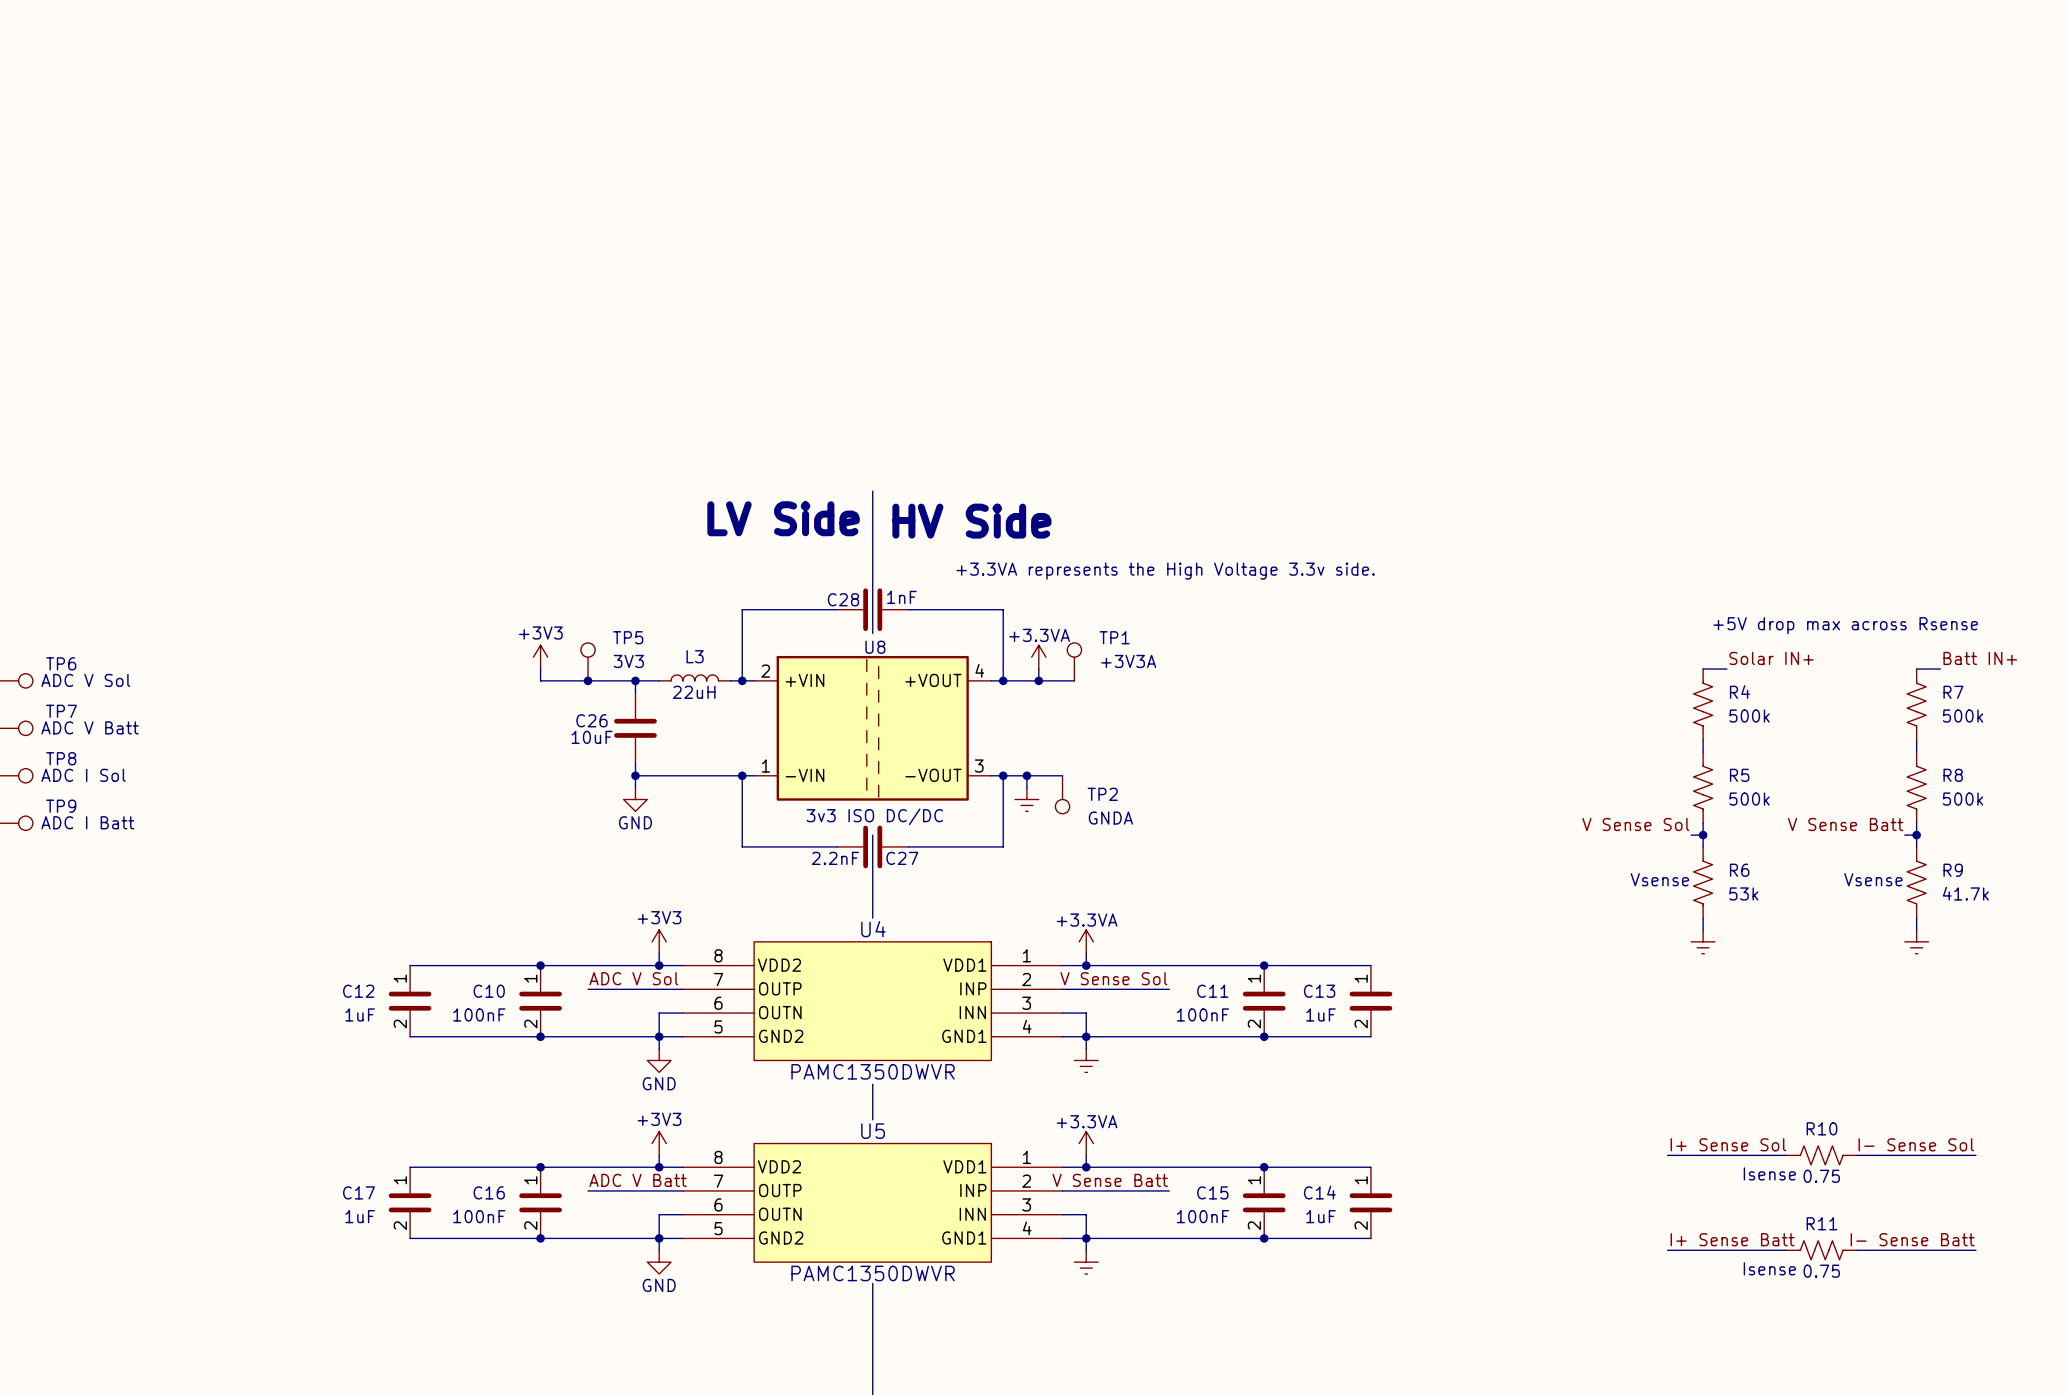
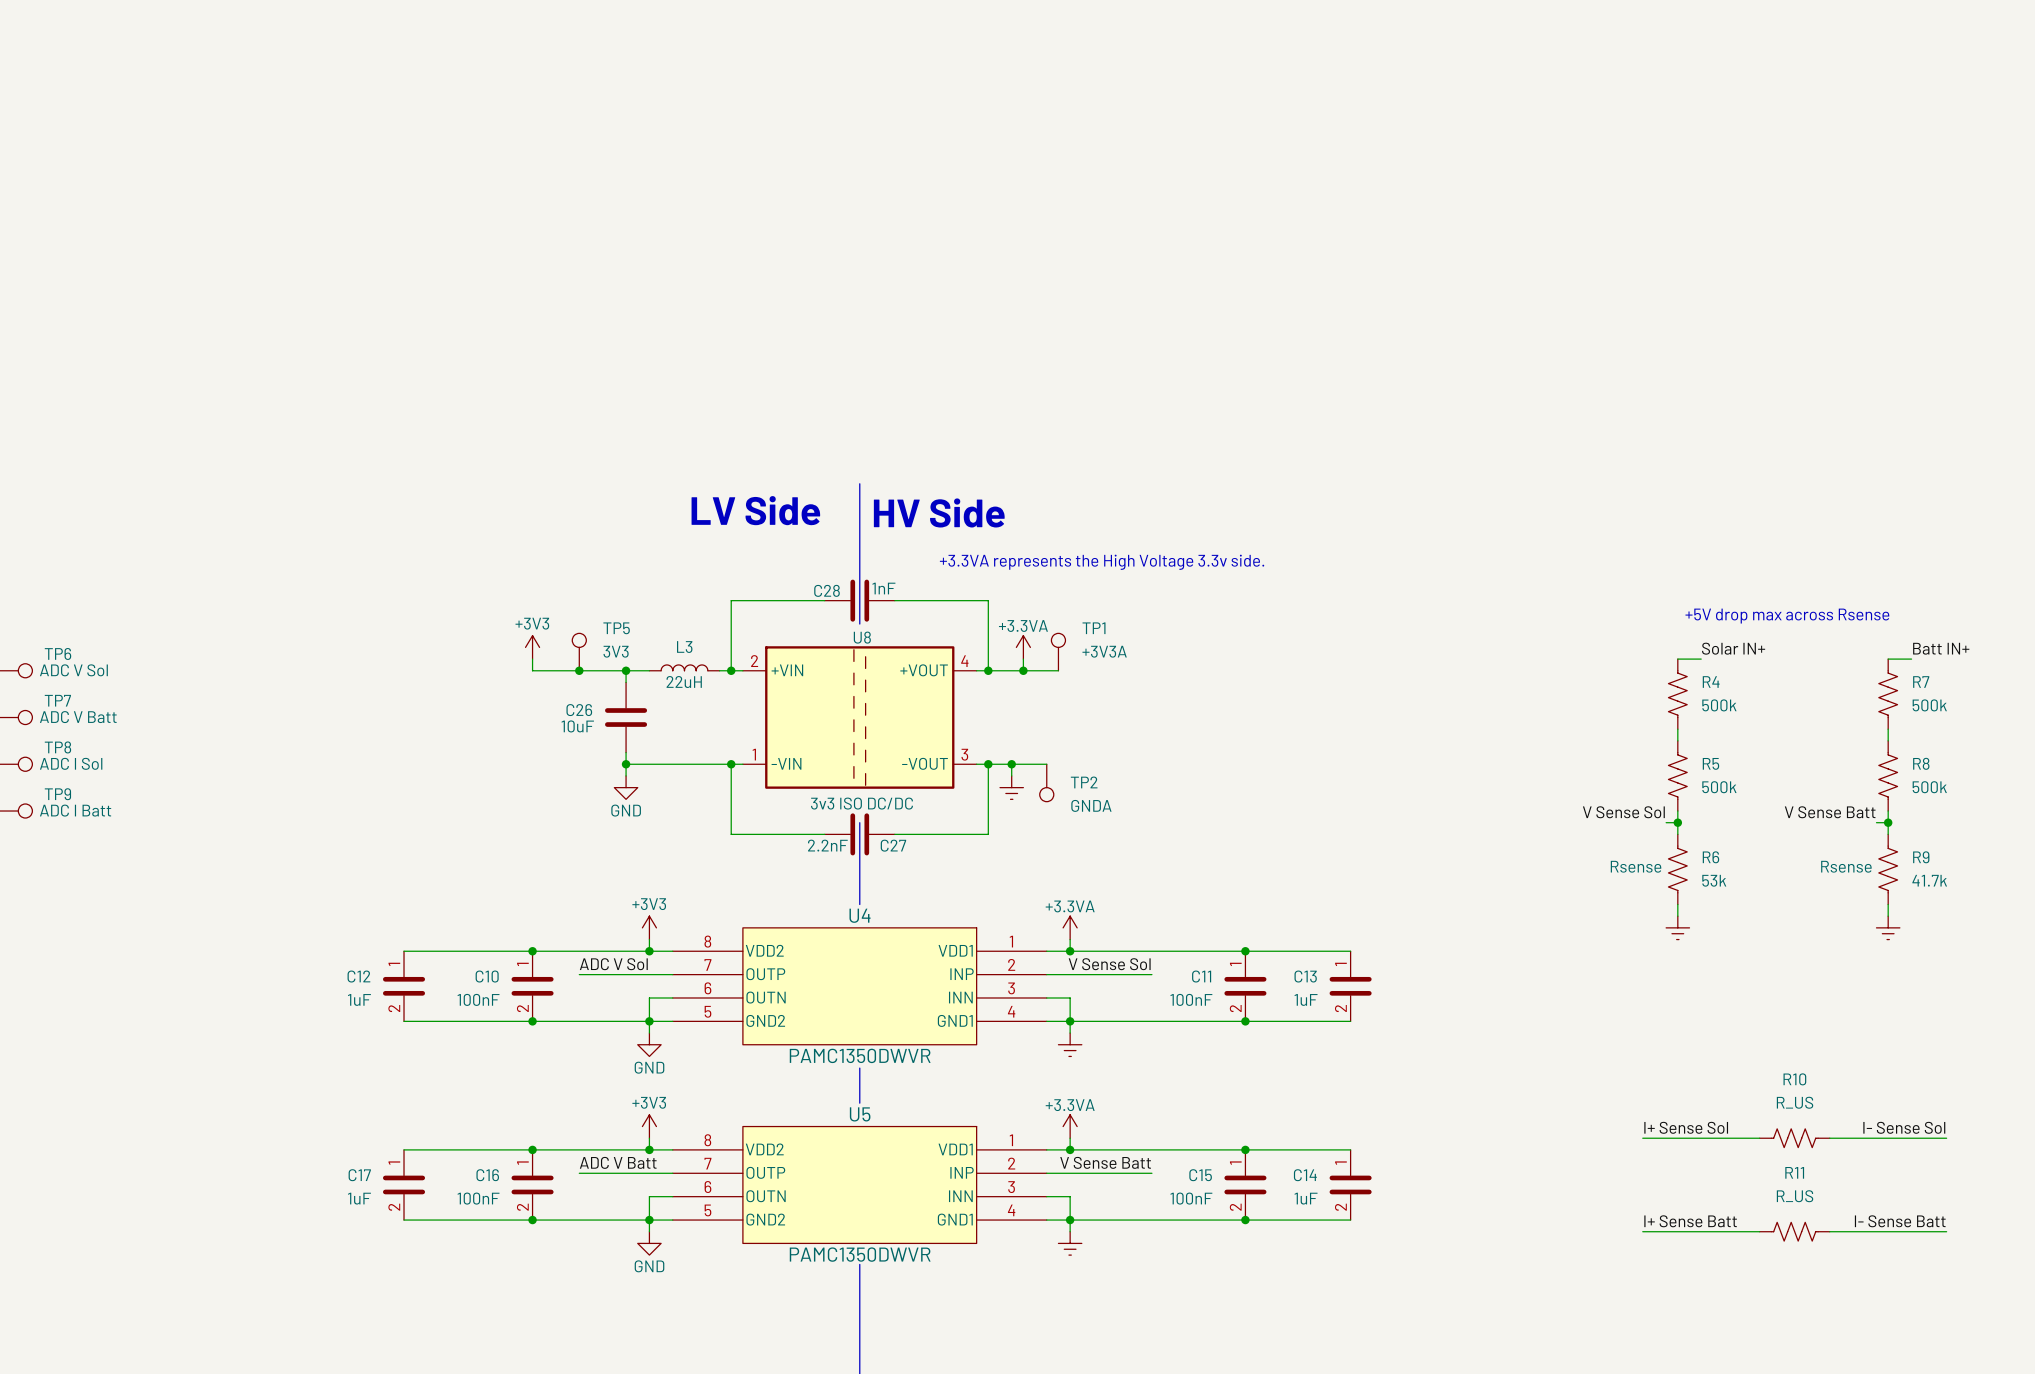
R6 text: Vsense (1659, 879) -> Rsense (1636, 866)
R9 text: Vsense (1873, 879) -> Rsense (1846, 866)
R10 name position: R10 (1822, 1128) -> R10 (1794, 1079)
R10 text: Isense (1769, 1173) -> none
R10 value: 0.75 (1821, 1176) -> R_US (1795, 1102)
R11 name position: R11 (1822, 1223) -> R11 (1794, 1172)
R11 text: Isense (1769, 1268) -> none
R11 value: 0.75 (1821, 1271) -> R_US (1795, 1196)

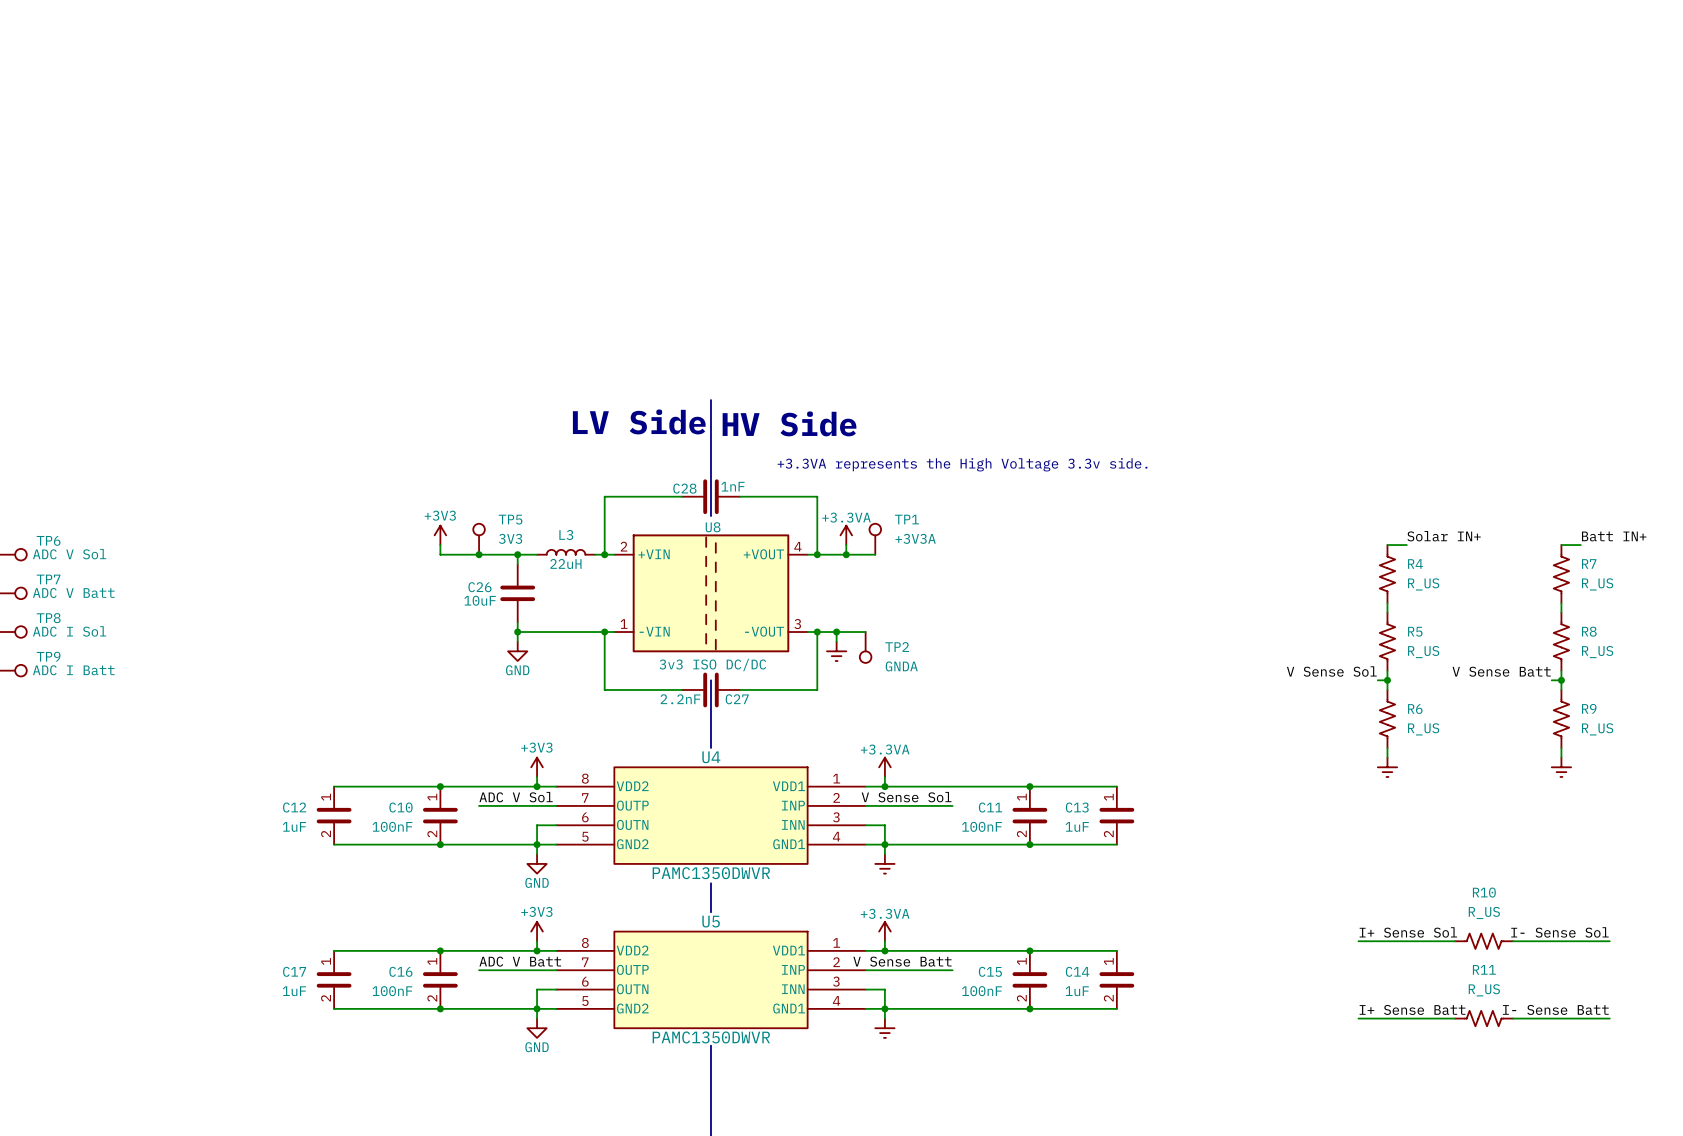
text: +5V drop max across Rsense (1787, 616) -> none
R4 value: 500k (1719, 705) -> R_US (1423, 584)
R7 value: 500k (1929, 705) -> R_US (1597, 584)
R5 value: 500k (1719, 787) -> R_US (1423, 652)
R8 value: 500k (1929, 787) -> R_US (1597, 652)
R6 text: Rsense (1636, 866) -> none
R9 text: Rsense (1846, 866) -> none
R6 value: 53k (1714, 880) -> R_US (1423, 729)
R9 value: 41.7k (1929, 880) -> R_US (1597, 729)

